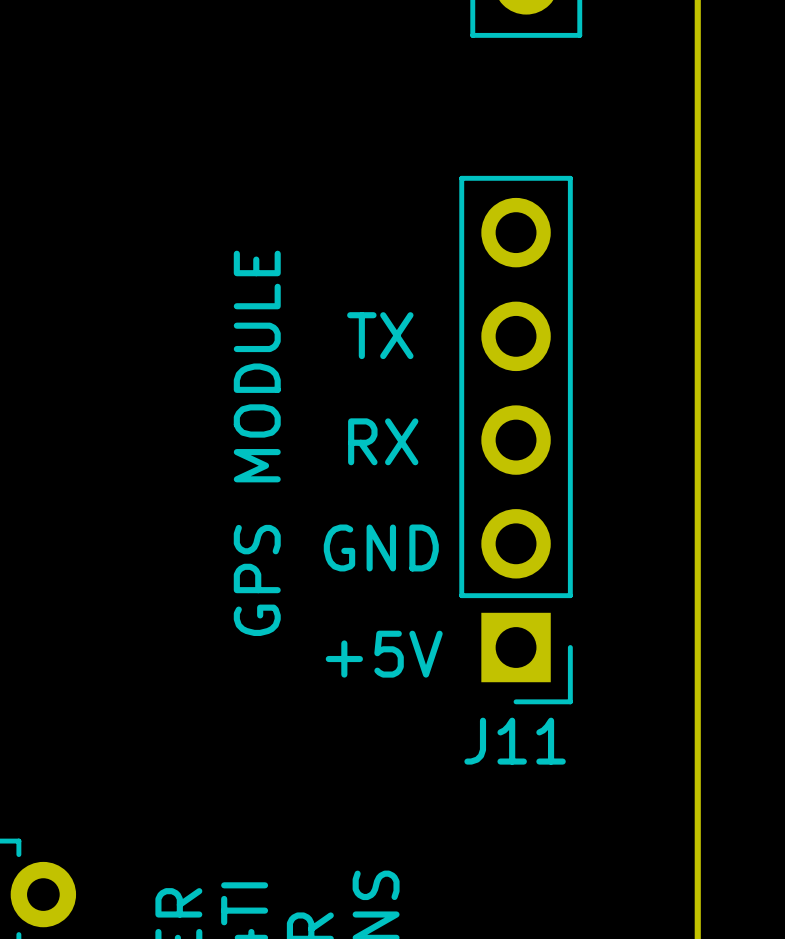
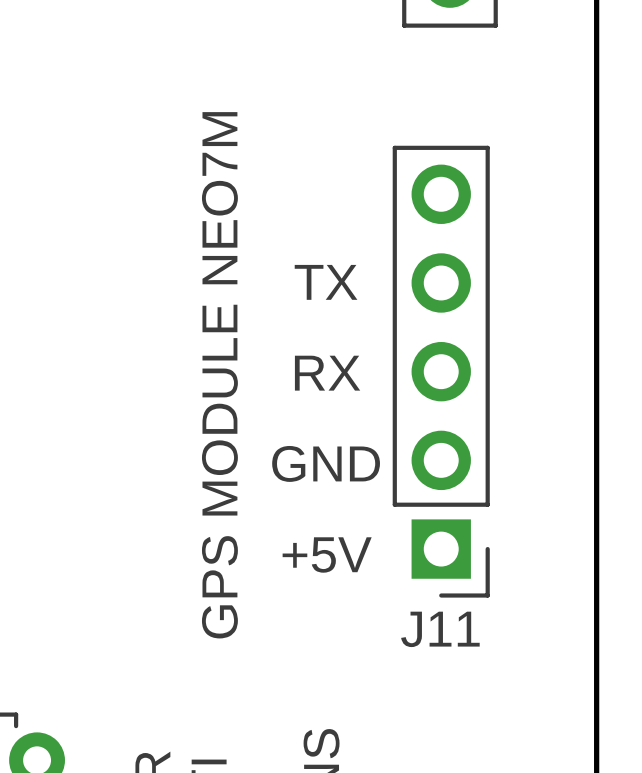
text: GPS MODULE (257, 443) -> GPS MODULE NEO7M (219, 375)

